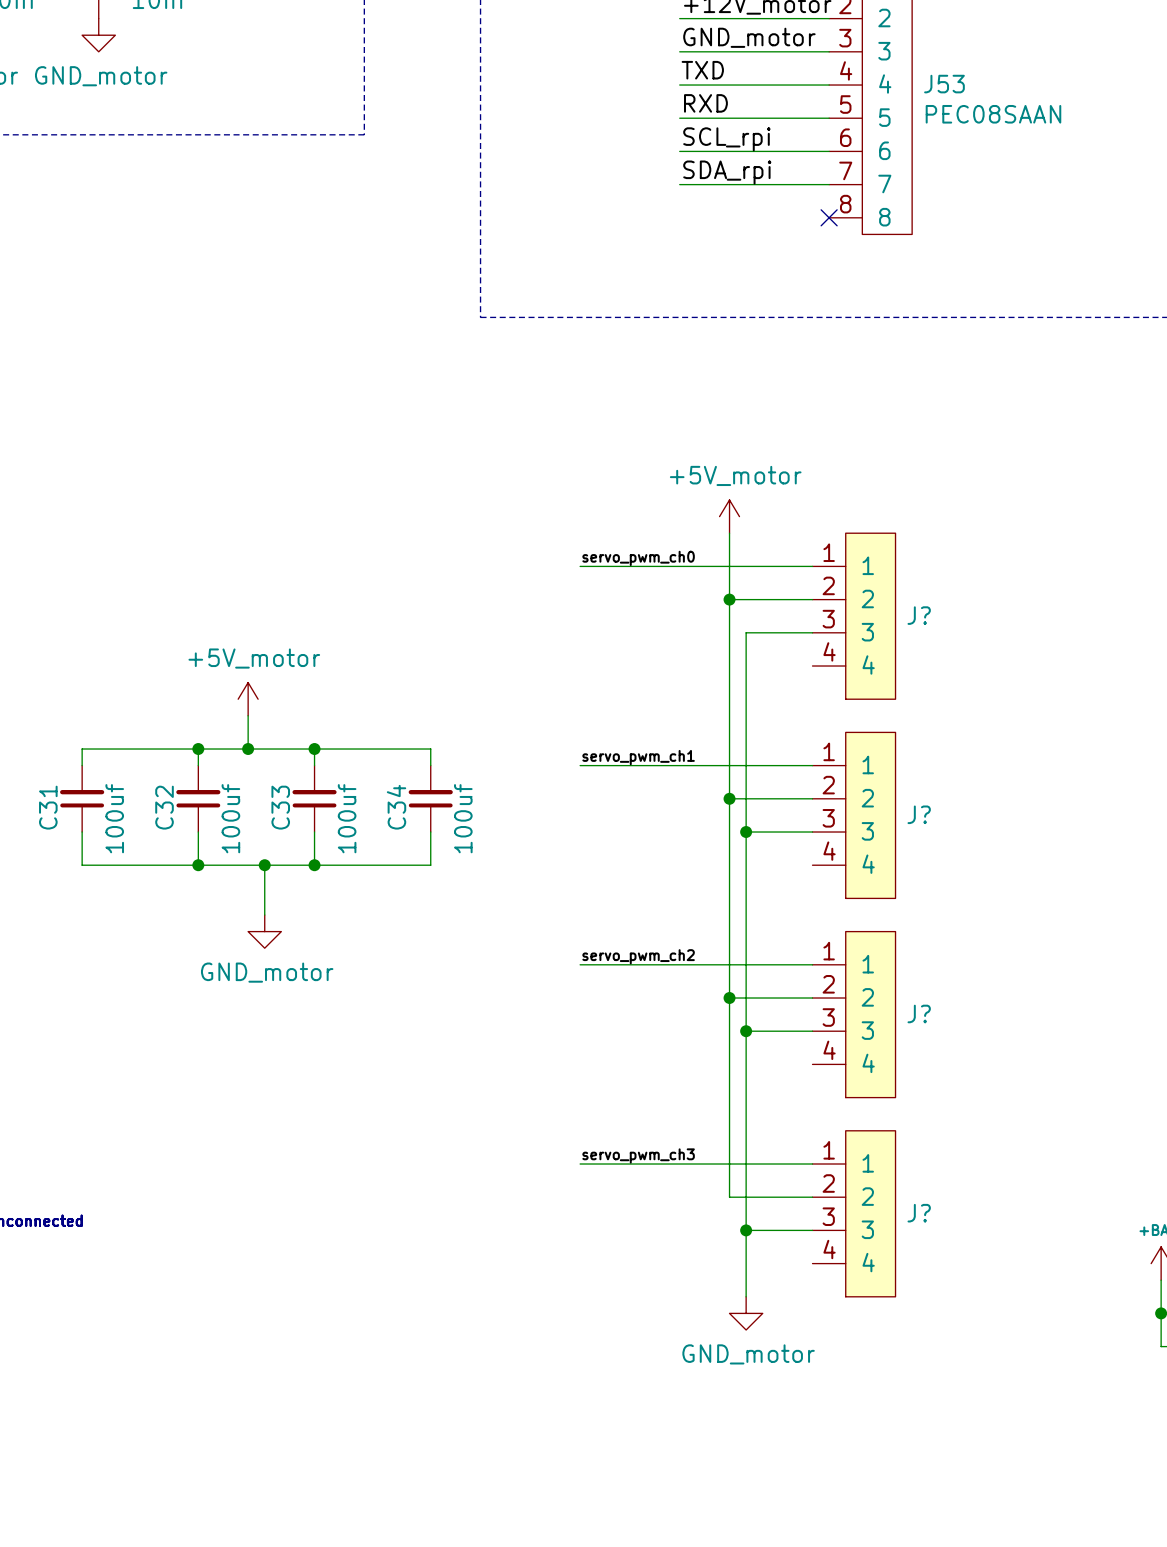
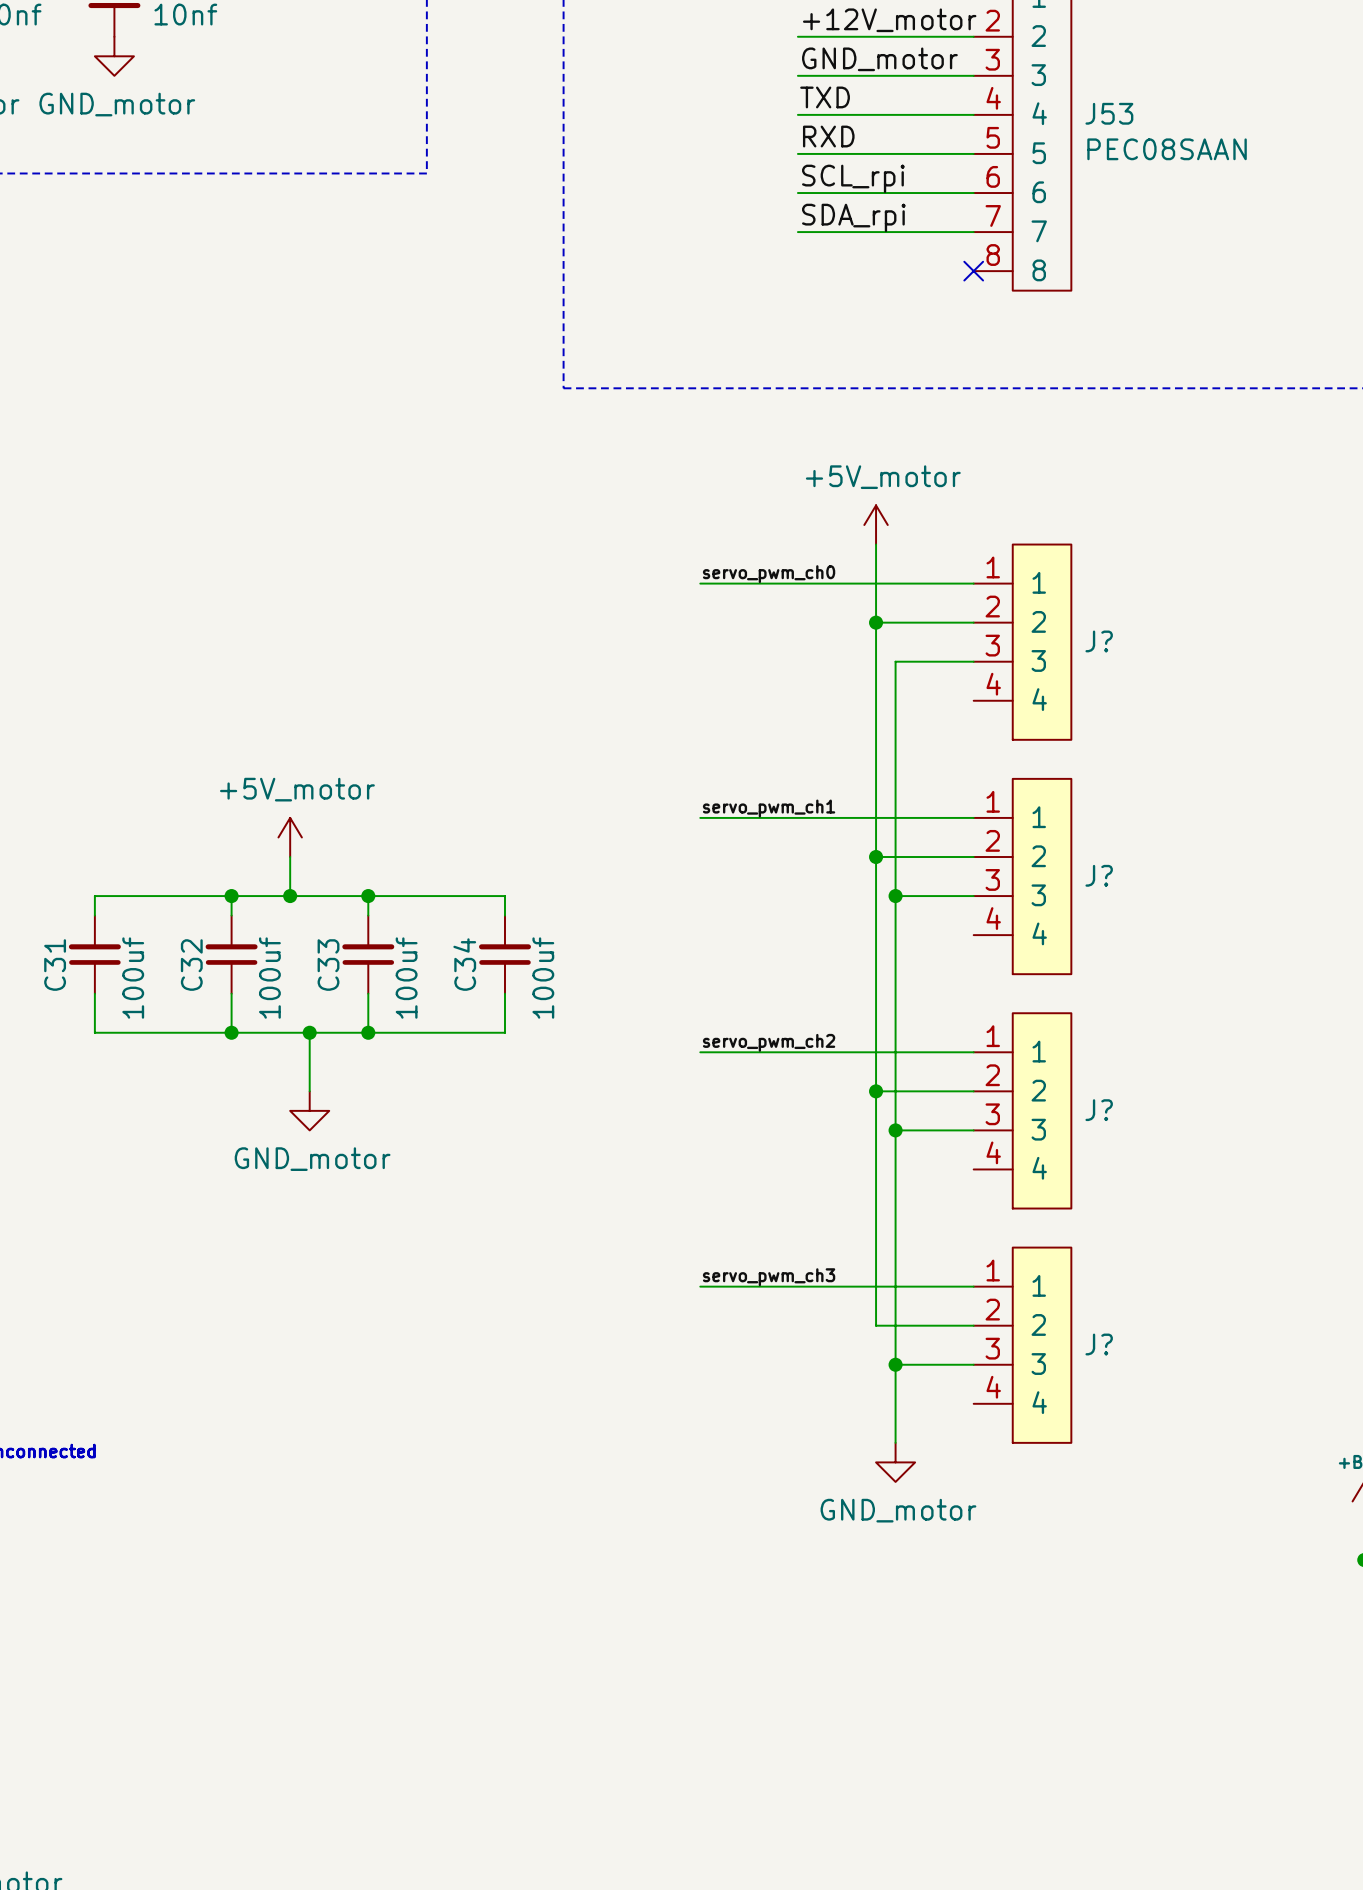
power symbol position: +5V_motor (729, 516) -> +5V_motor (876, 525)
junction: none -> (876, 622)
wire: (729, 533) (729, 1197) (812, 1197) -> none
J?: none -> (1022, 642)
wire: none -> (973, 661) (895, 661) (895, 1442)
label position: servo_pwm_ch0 (638, 558) -> servo_pwm_ch0 (769, 574)
wire: (580, 566) (812, 566) -> (700, 583) (973, 583)
wire: (729, 599) (812, 599) -> (876, 622) (973, 622)
junction: (729, 599) -> none
J?: (854, 616) -> none
wire: (746, 632) (812, 632) -> (876, 759) (876, 544)
junction: none -> (876, 857)
J?: none -> (1022, 876)
junction: none -> (895, 896)
label position: servo_pwm_ch1 (638, 757) -> servo_pwm_ch1 (769, 808)
wire: (580, 765) (812, 765) -> (700, 817) (973, 817)
wire: (729, 798) (812, 798) -> (876, 857) (973, 857)
junction: (729, 798) -> none
J?: (854, 815) -> none
wire: (746, 832) (812, 832) -> (895, 896) (973, 896)
junction: (746, 832) -> none
junction: none -> (876, 1091)
J?: none -> (1022, 1110)
junction: none -> (895, 1130)
label position: servo_pwm_ch2 (638, 956) -> servo_pwm_ch2 (769, 1042)
wire: (580, 964) (812, 964) -> (700, 1052) (973, 1052)
wire: (729, 998) (812, 998) -> (876, 1091) (973, 1091)
junction: (729, 998) -> none
J?: (854, 1014) -> none
wire: (746, 1031) (812, 1031) -> (895, 1130) (973, 1130)
junction: (746, 1031) -> none
wire: (746, 1114) (746, 1296) -> (876, 1325) (973, 1325)
J?: none -> (1022, 1345)
junction: none -> (895, 1364)
label position: servo_pwm_ch3 (638, 1155) -> servo_pwm_ch3 (769, 1277)
wire: (580, 1164) (812, 1164) -> (700, 1286) (973, 1286)
J?: (854, 1213) -> none
wire: (746, 1230) (812, 1230) -> (895, 1364) (973, 1364)
junction: (746, 1230) -> none
power symbol position: GND_motor (746, 1313) -> GND_motor (895, 1462)

